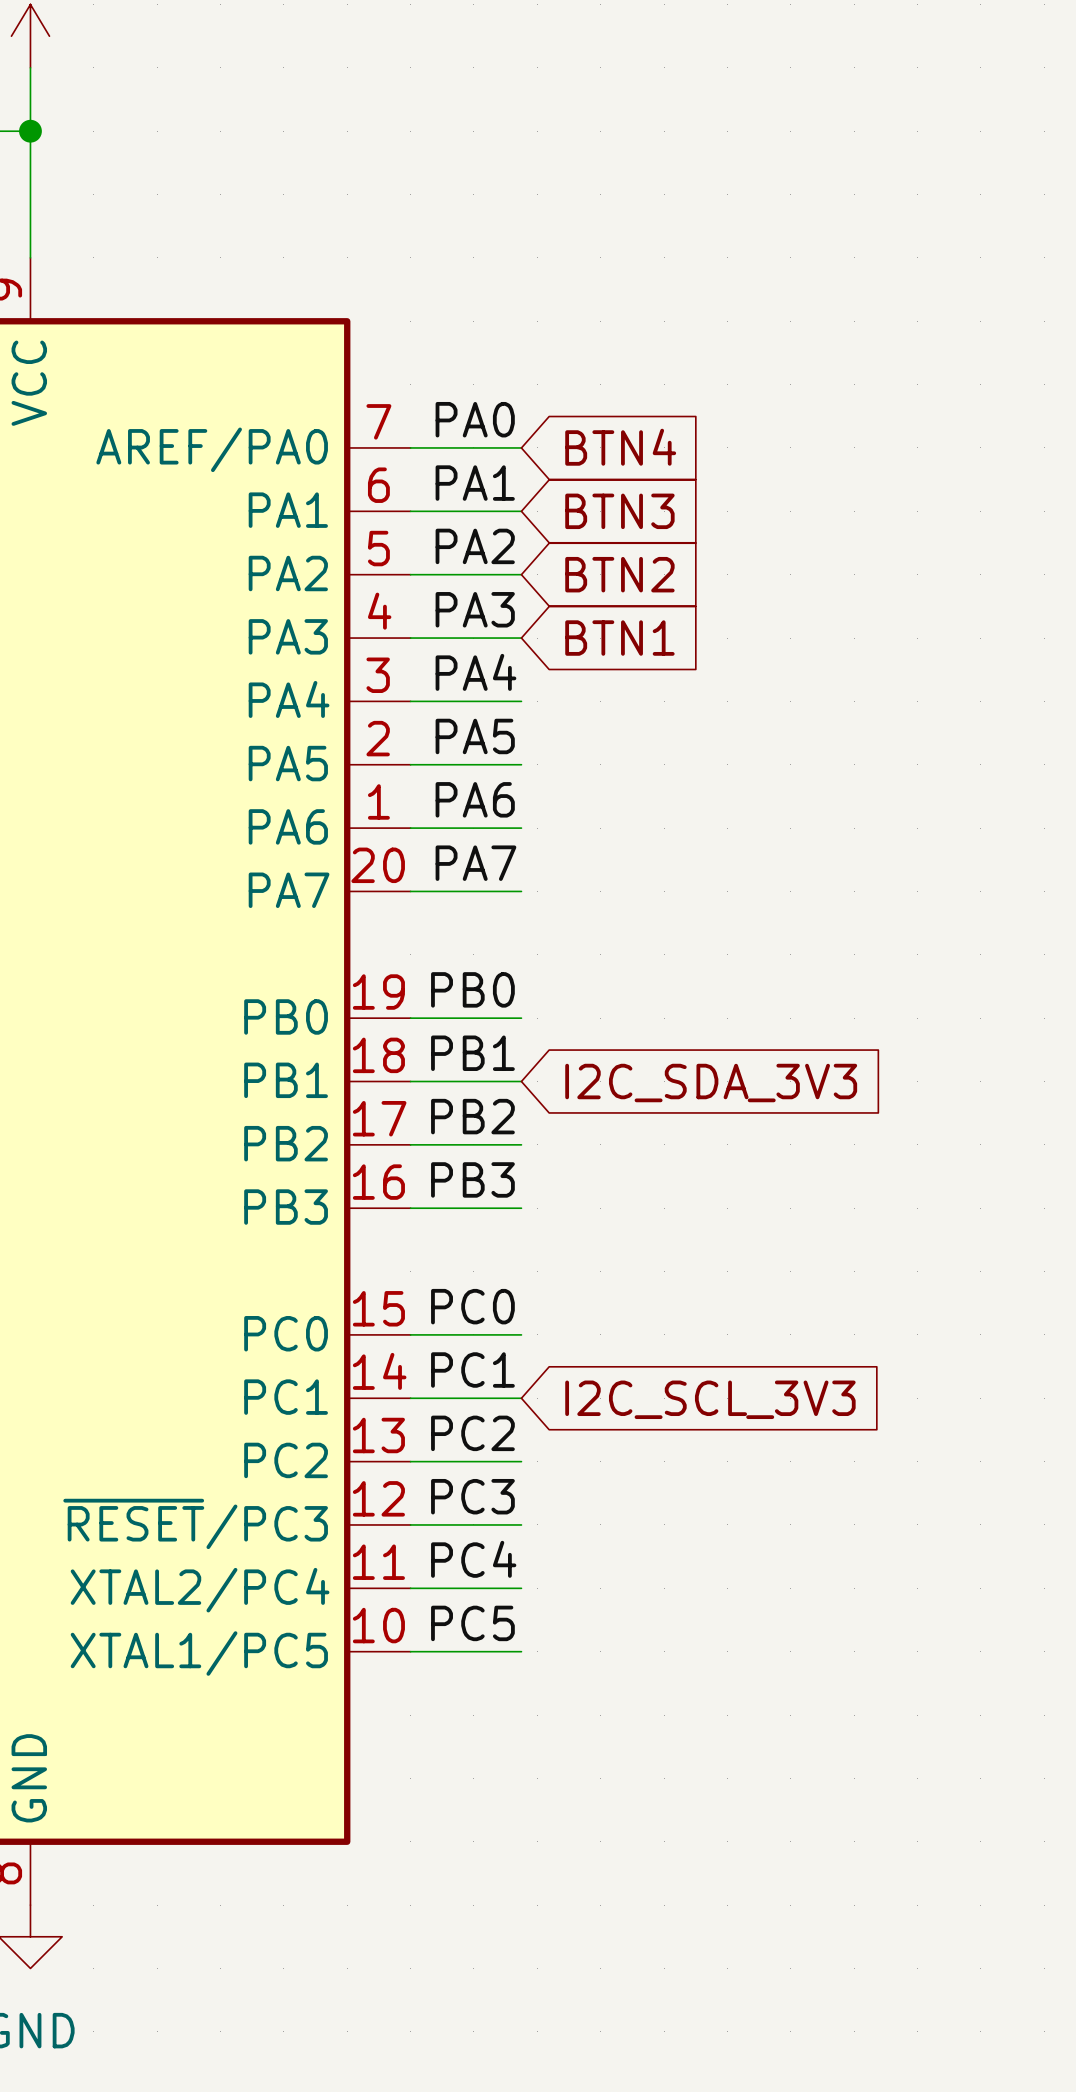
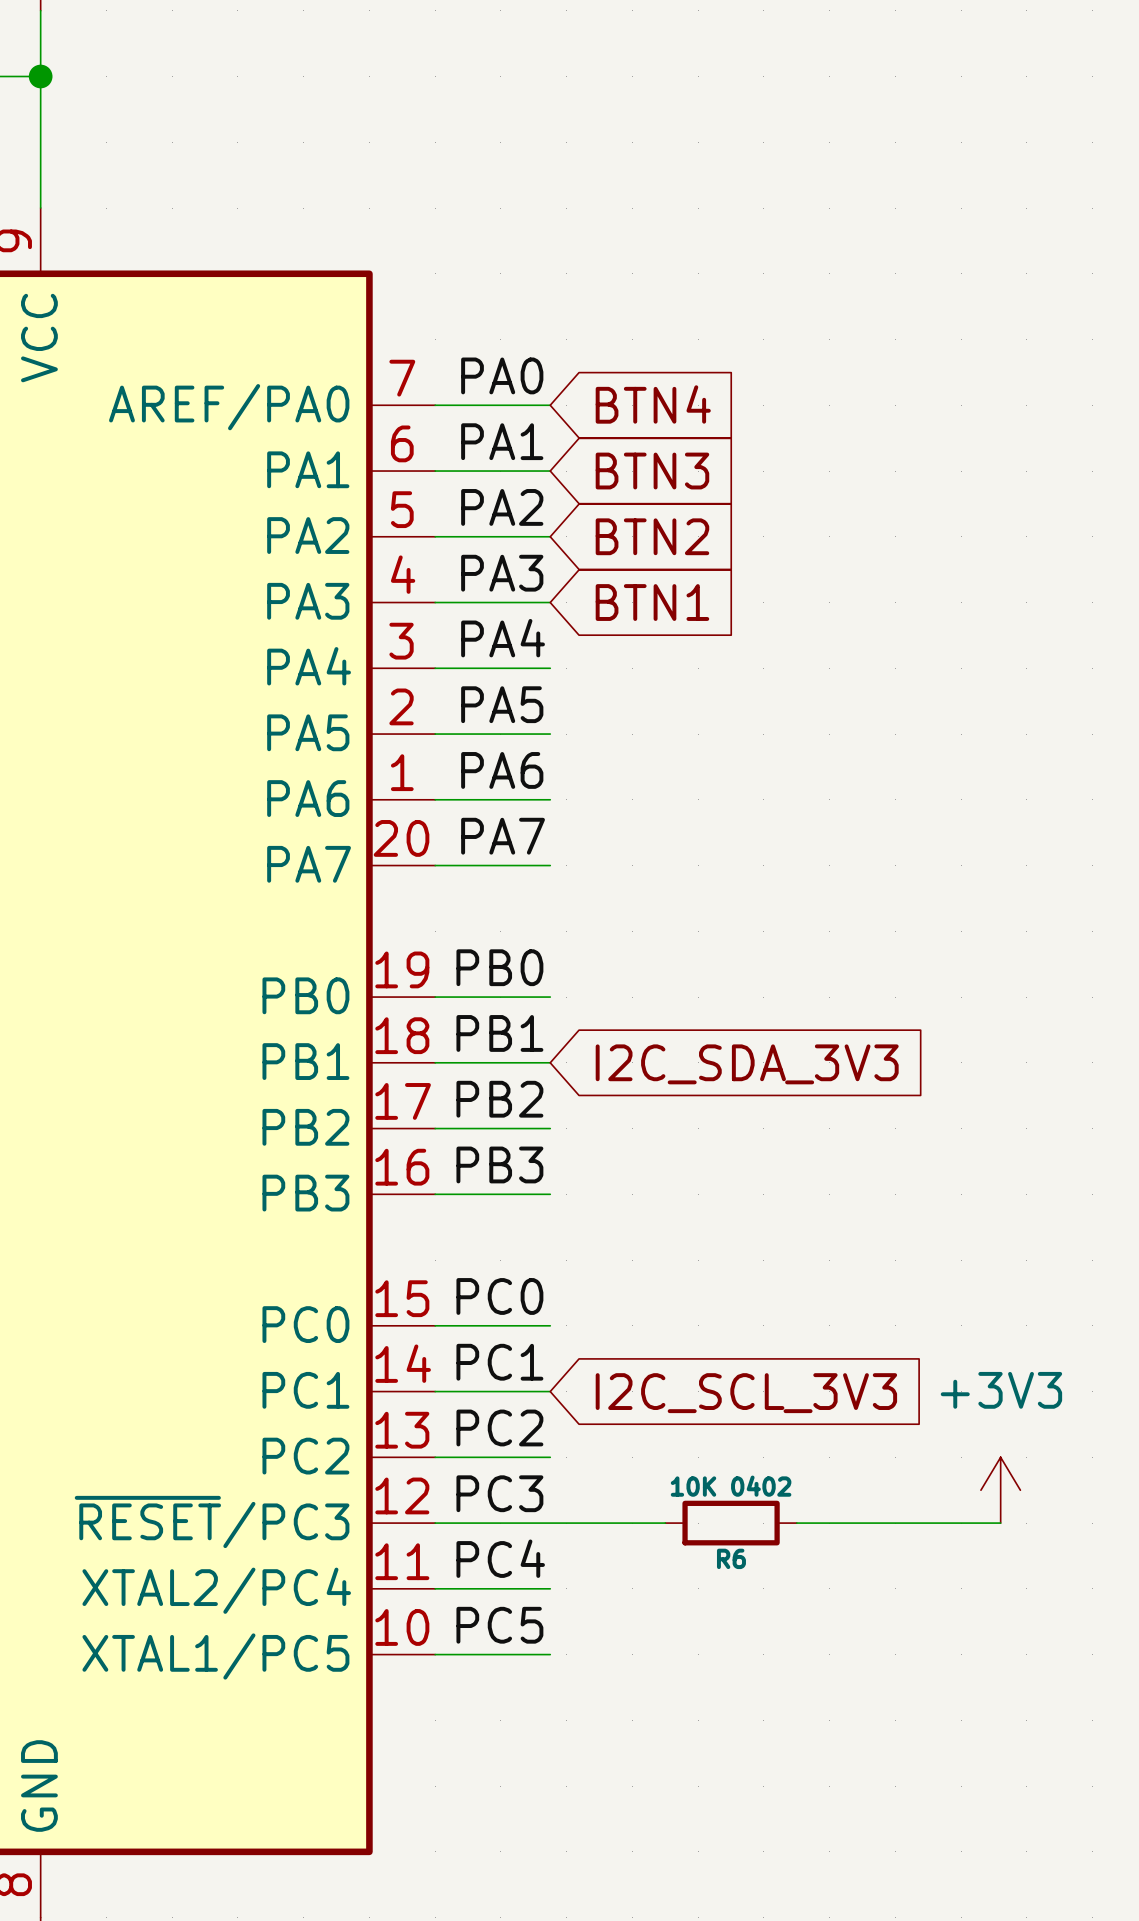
power symbol: none -> +3V3 (1000, 1490)
wire: none -> (550, 1523) (665, 1523)
R6: none -> 10K 0402 (731, 1523)
wire: none -> (796, 1523) (1000, 1523)

